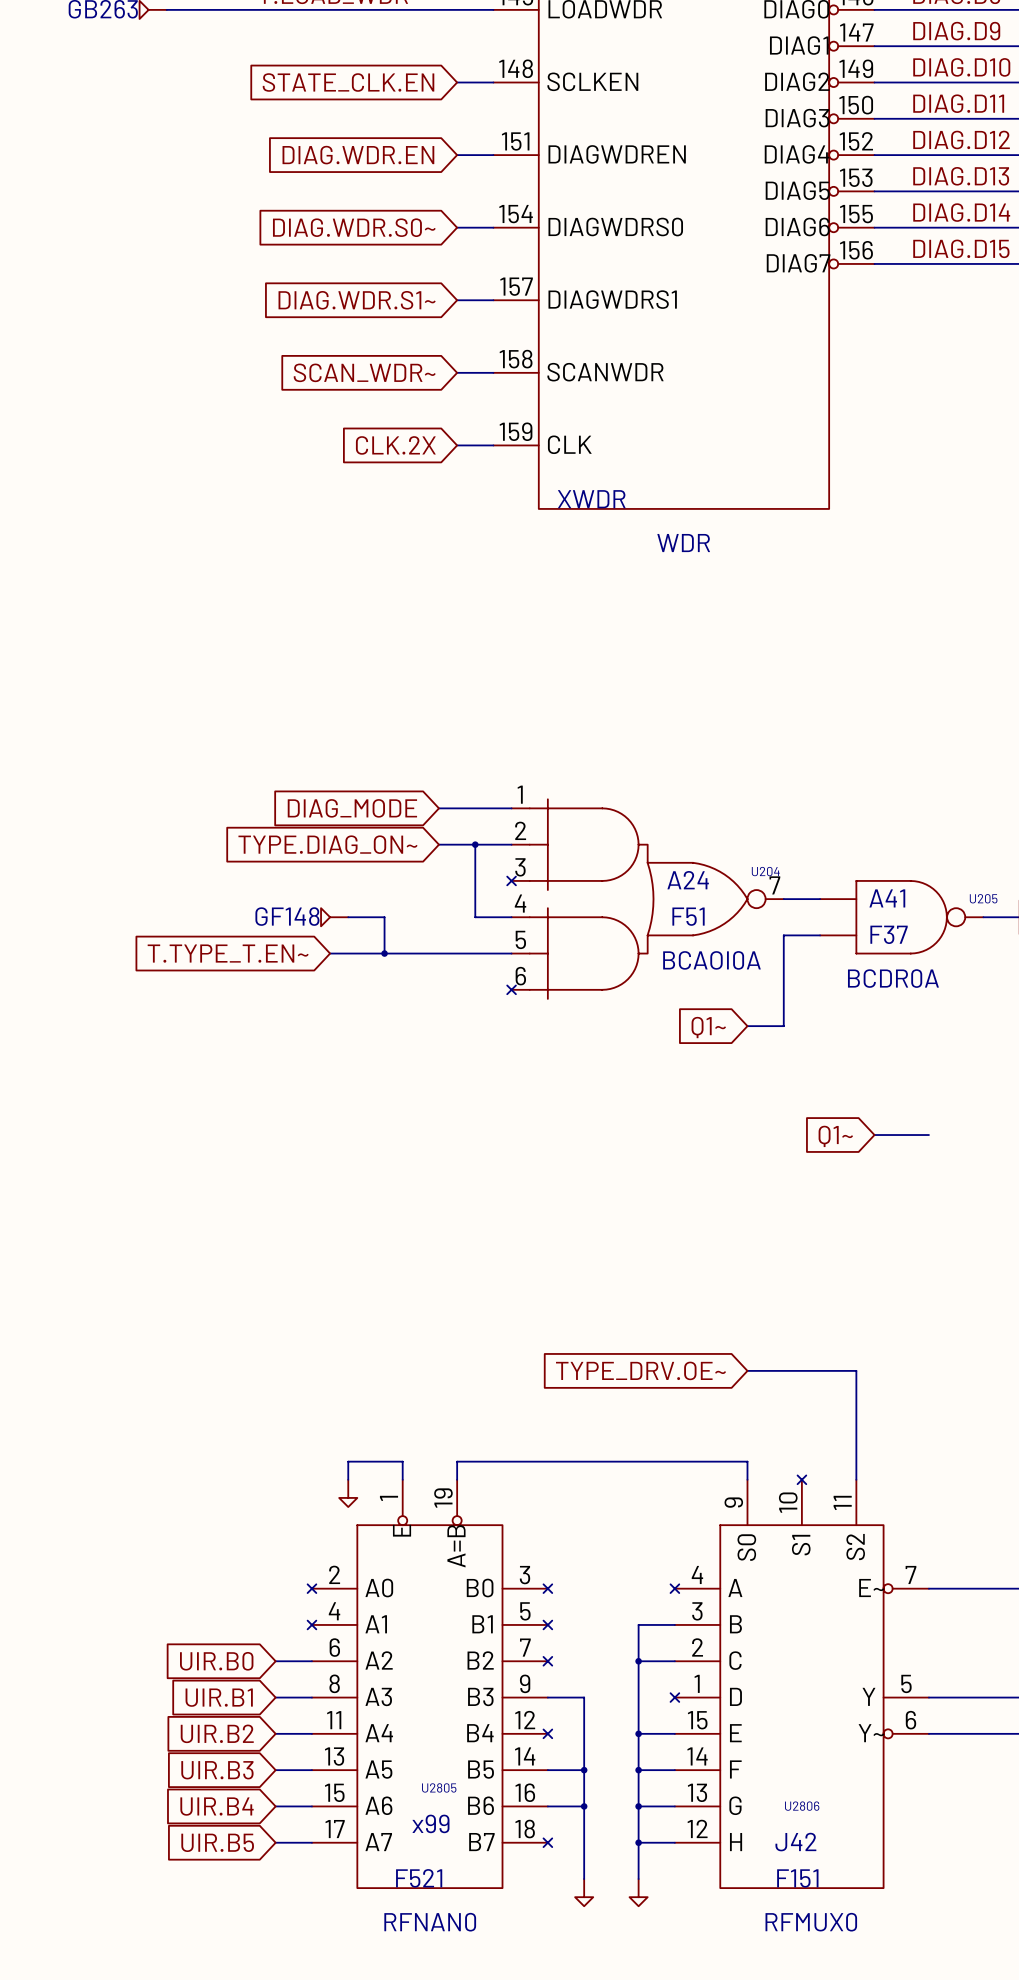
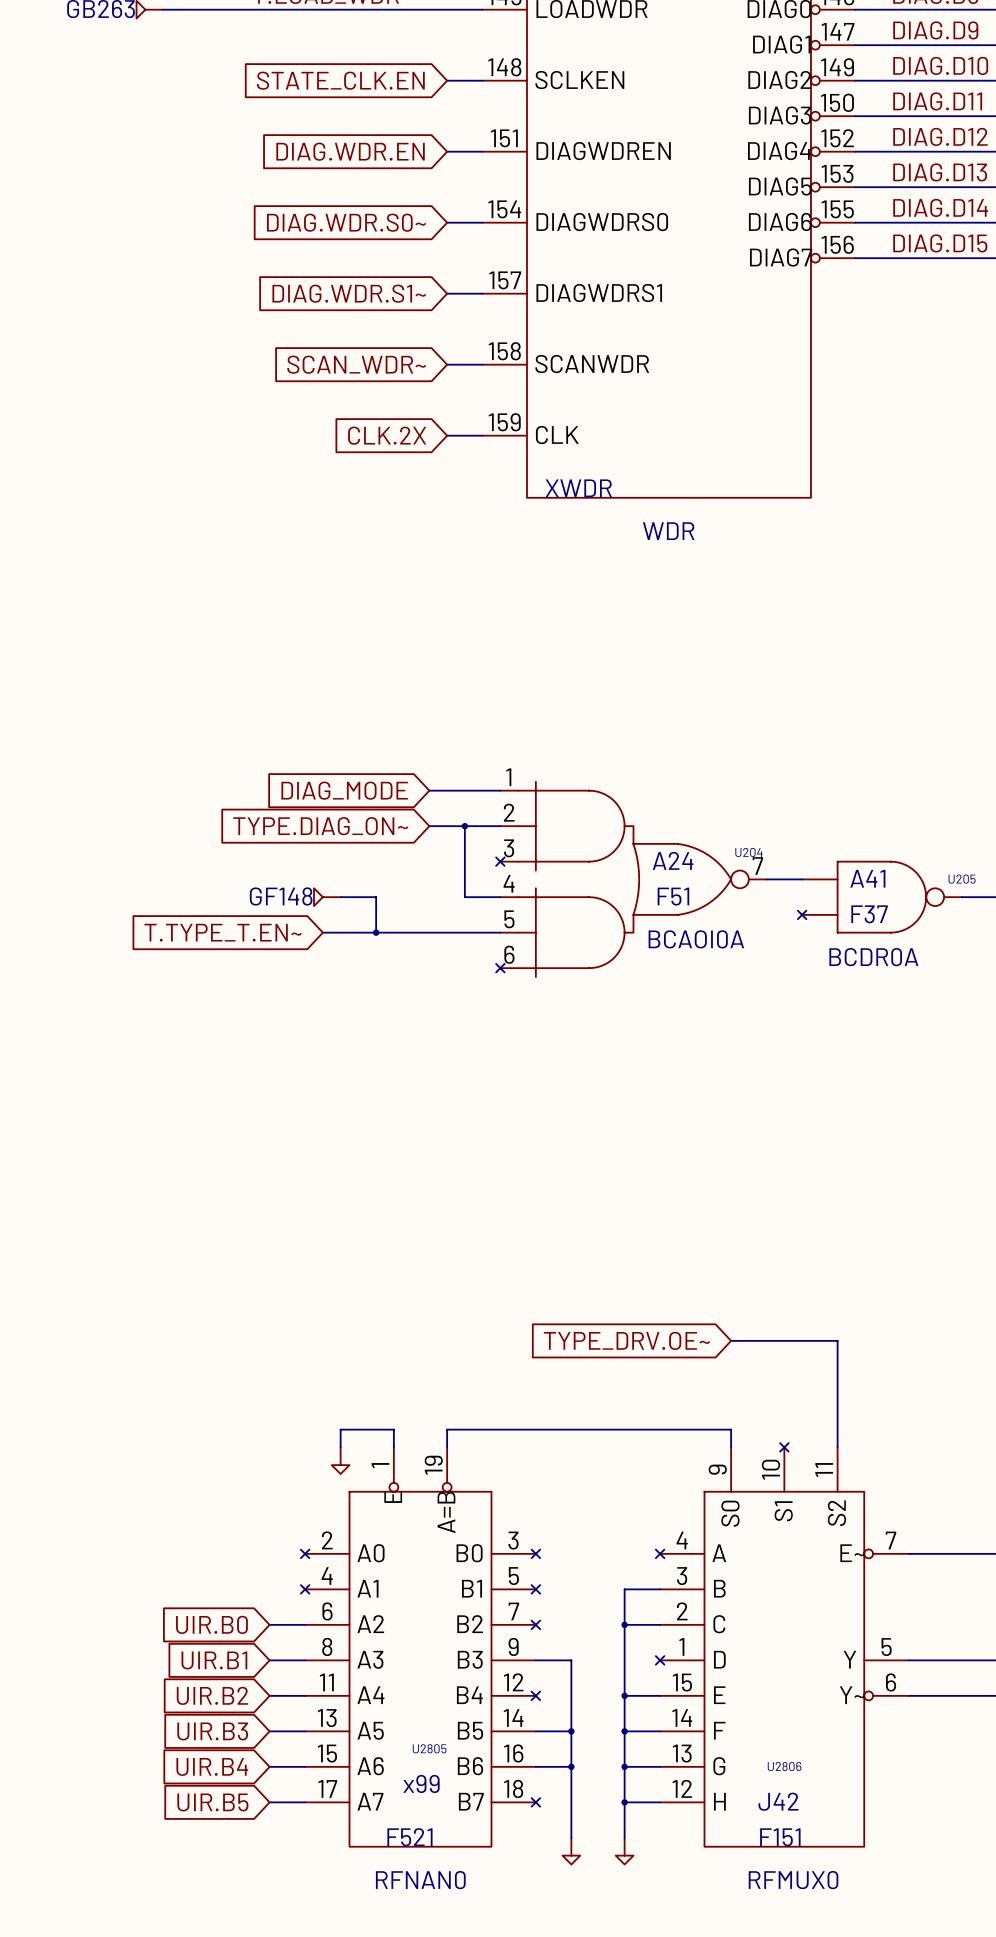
wire: (820, 935) (783, 935) (783, 1026) (747, 1026) -> none
no-connect mark: none -> (802, 914)
global label: Q1~ (708, 1027) -> none
wire: (874, 1135) (928, 1135) -> none
global label: Q1~ (835, 1136) -> none

